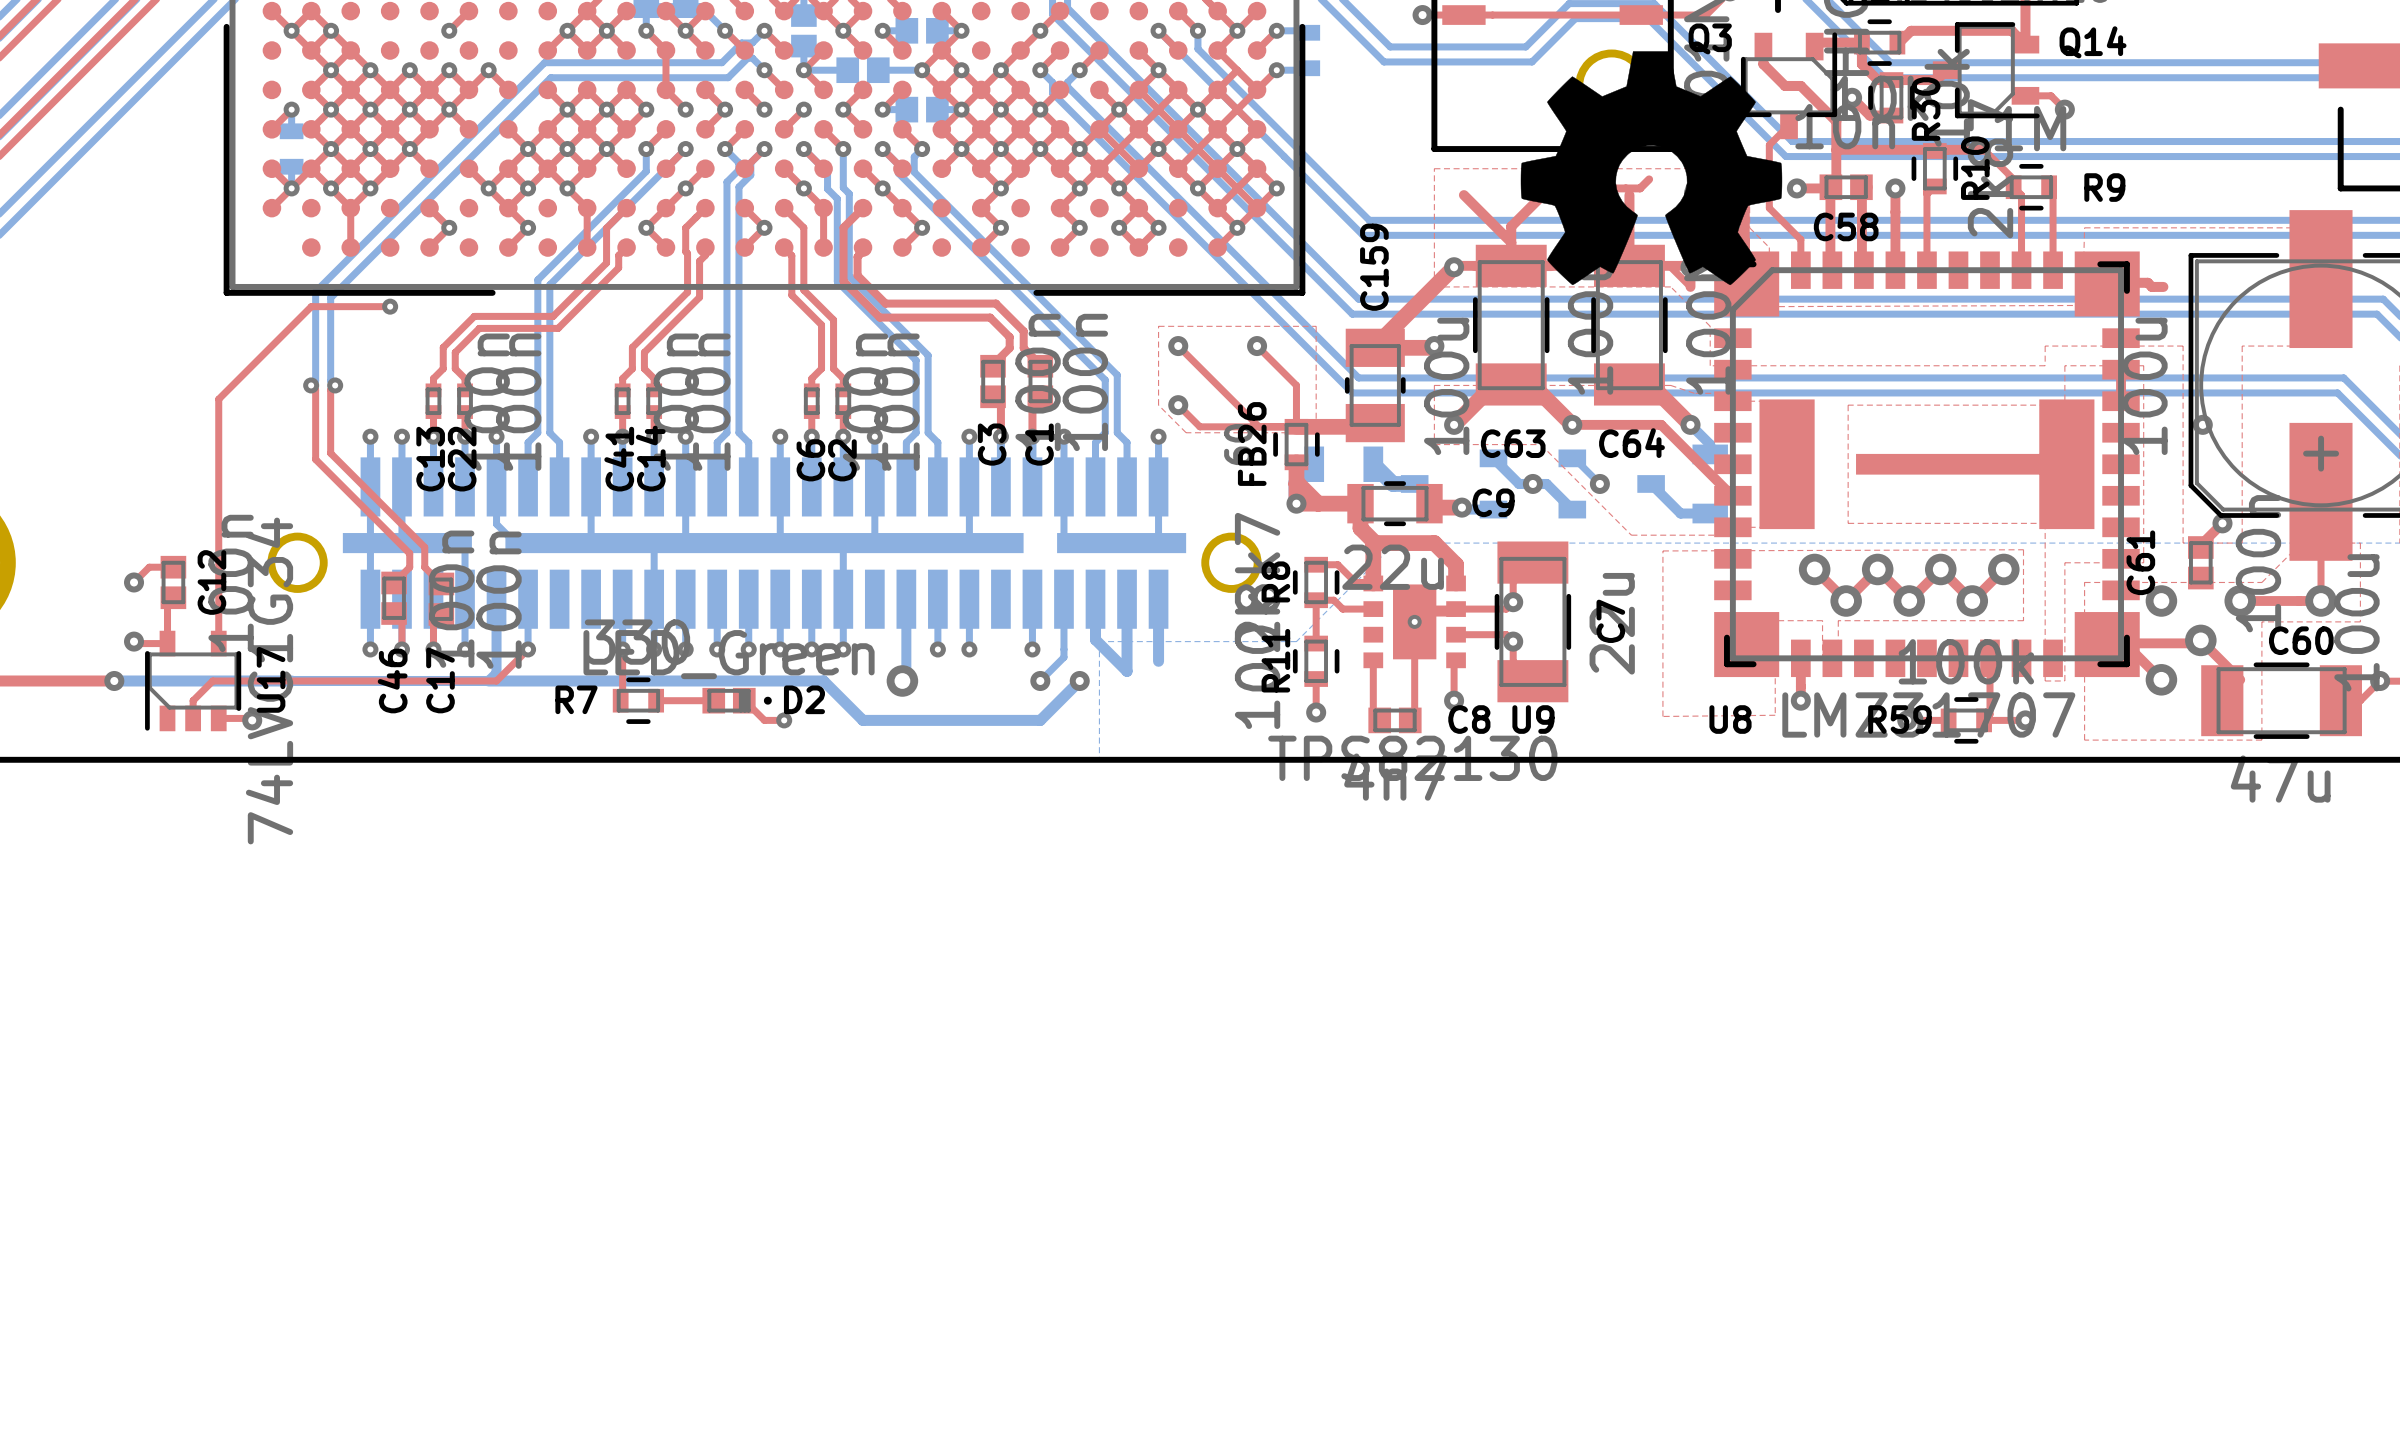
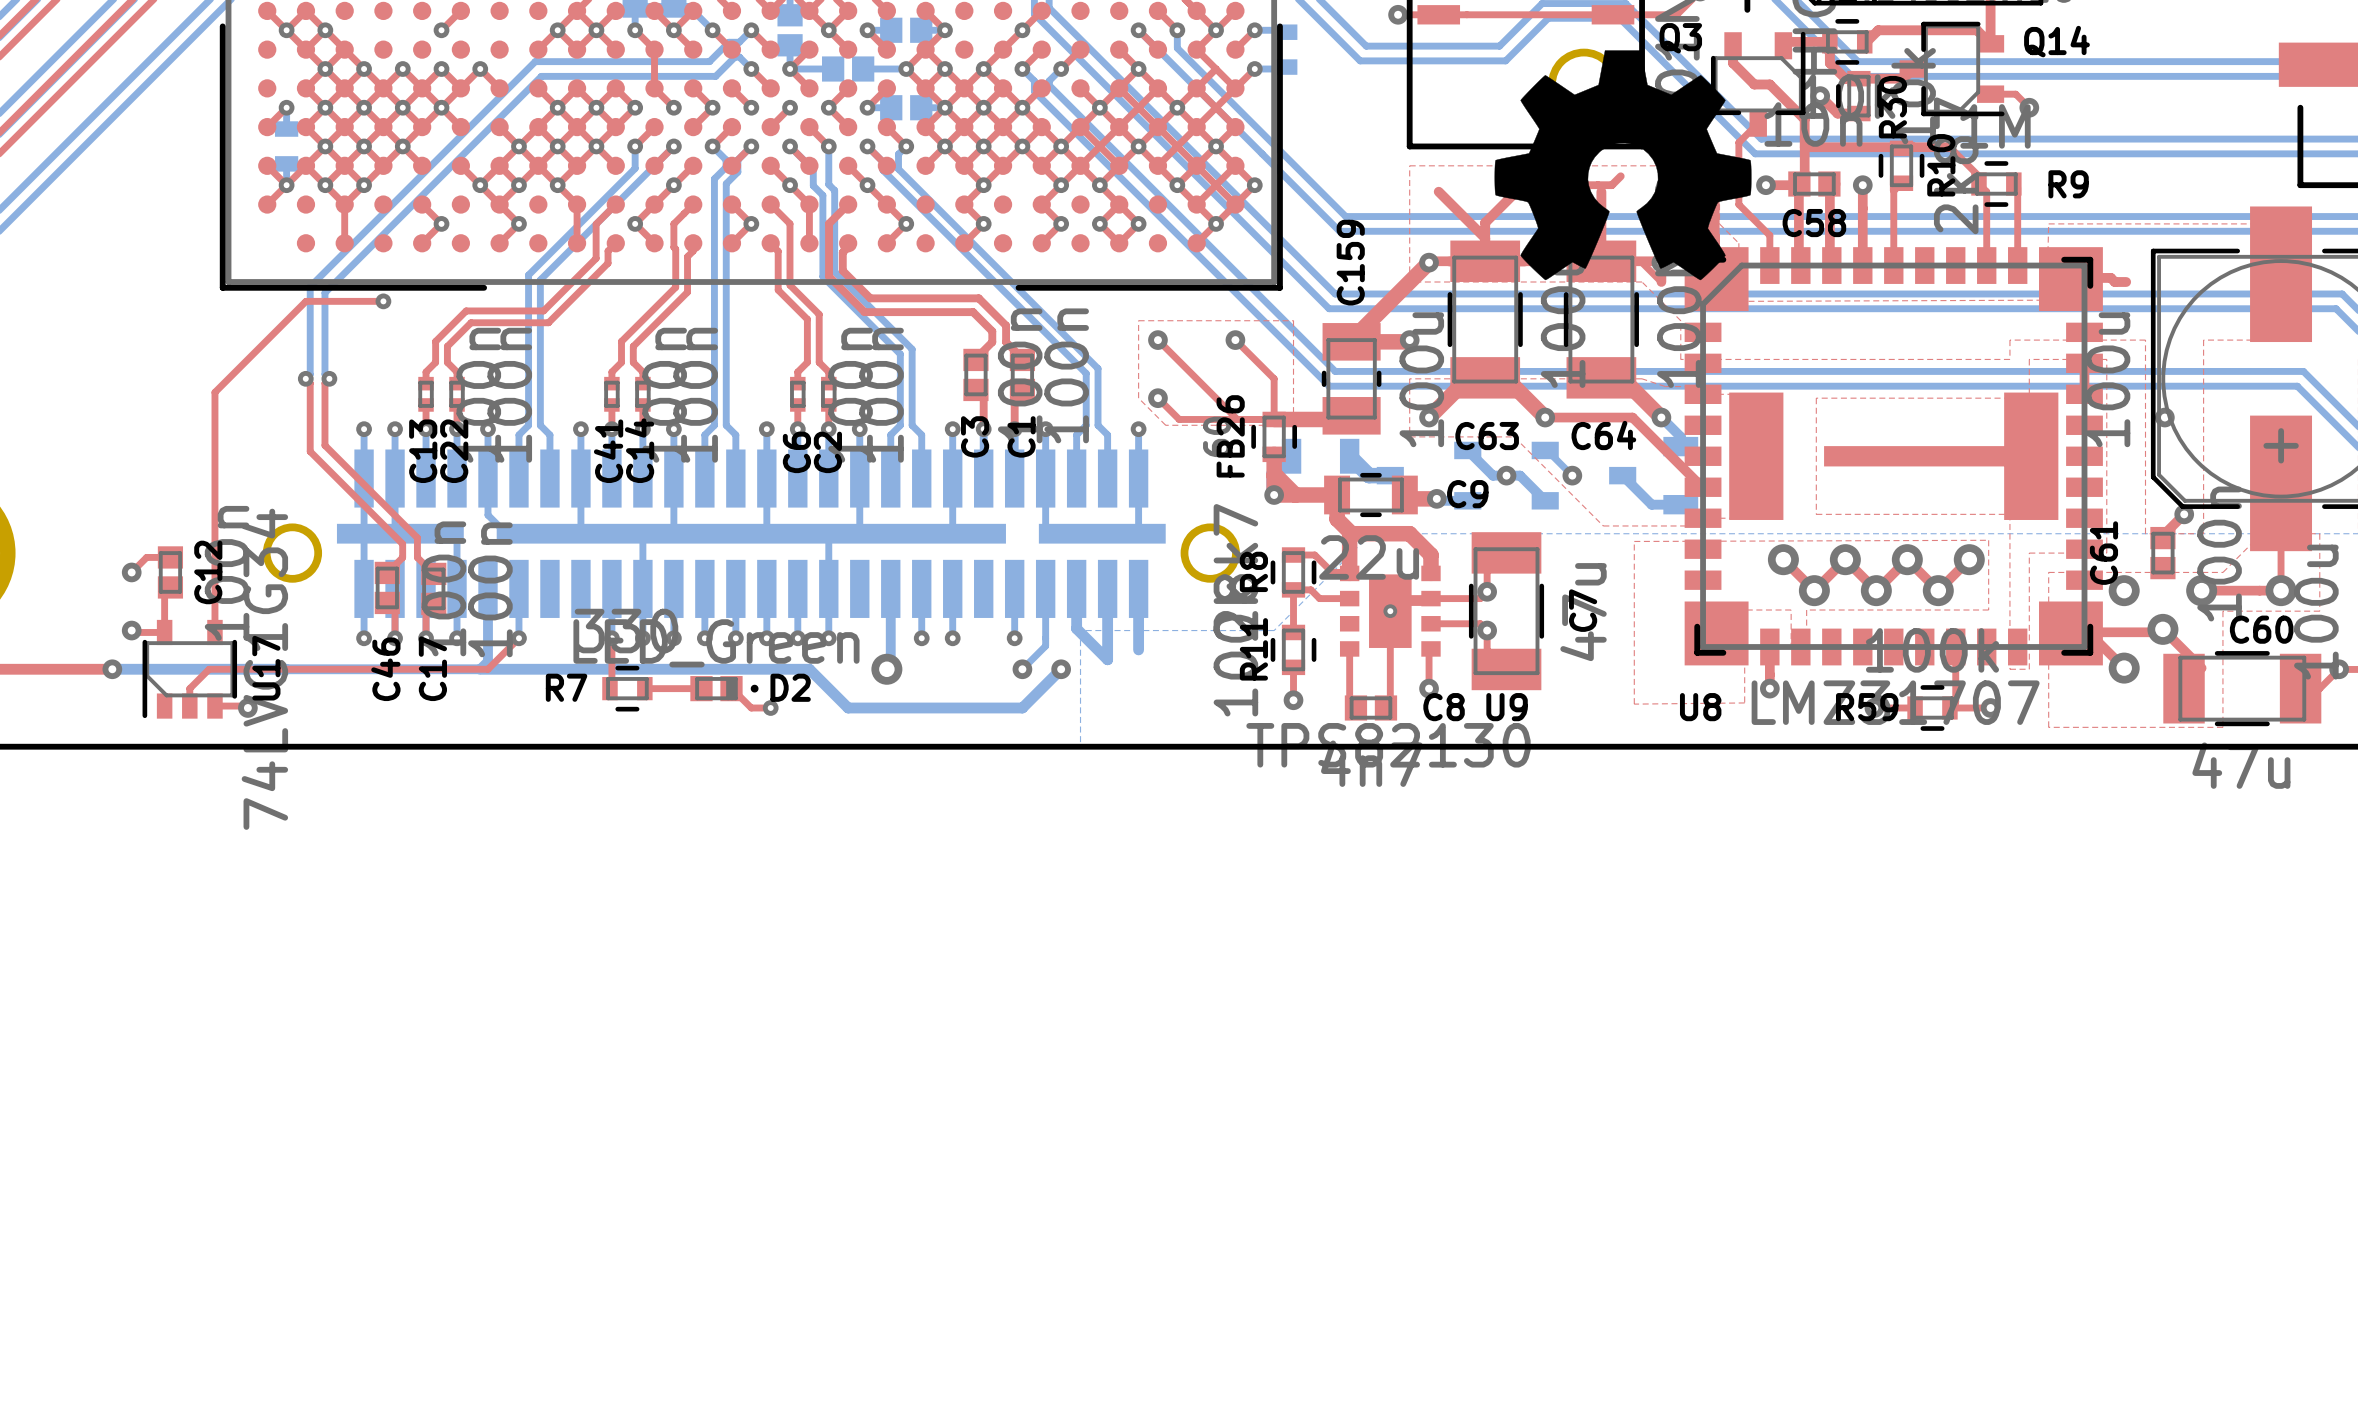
C7 value: 22u (1612, 623) -> 47u (1583, 612)

